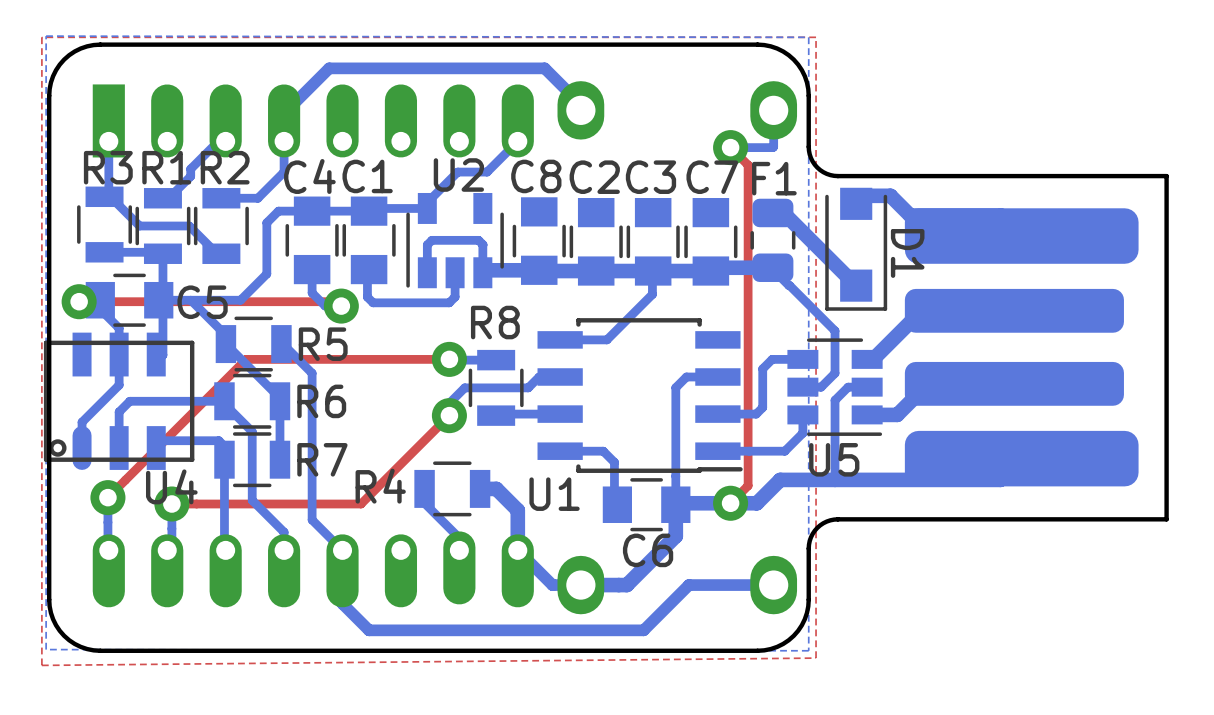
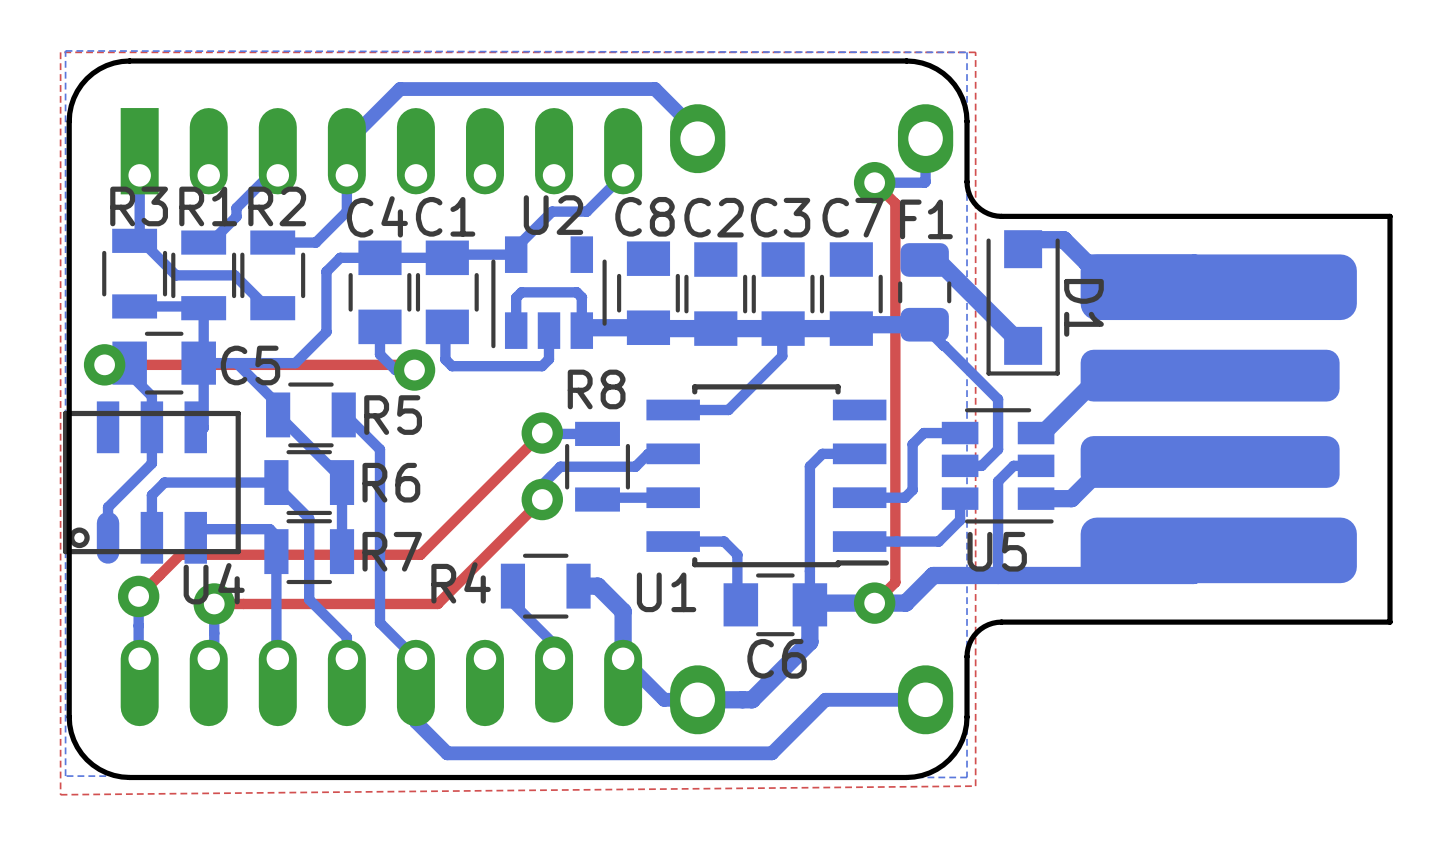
top track: (449, 359) (246, 359) (143, 462) -> (542, 433) (420, 554) (180, 554)

